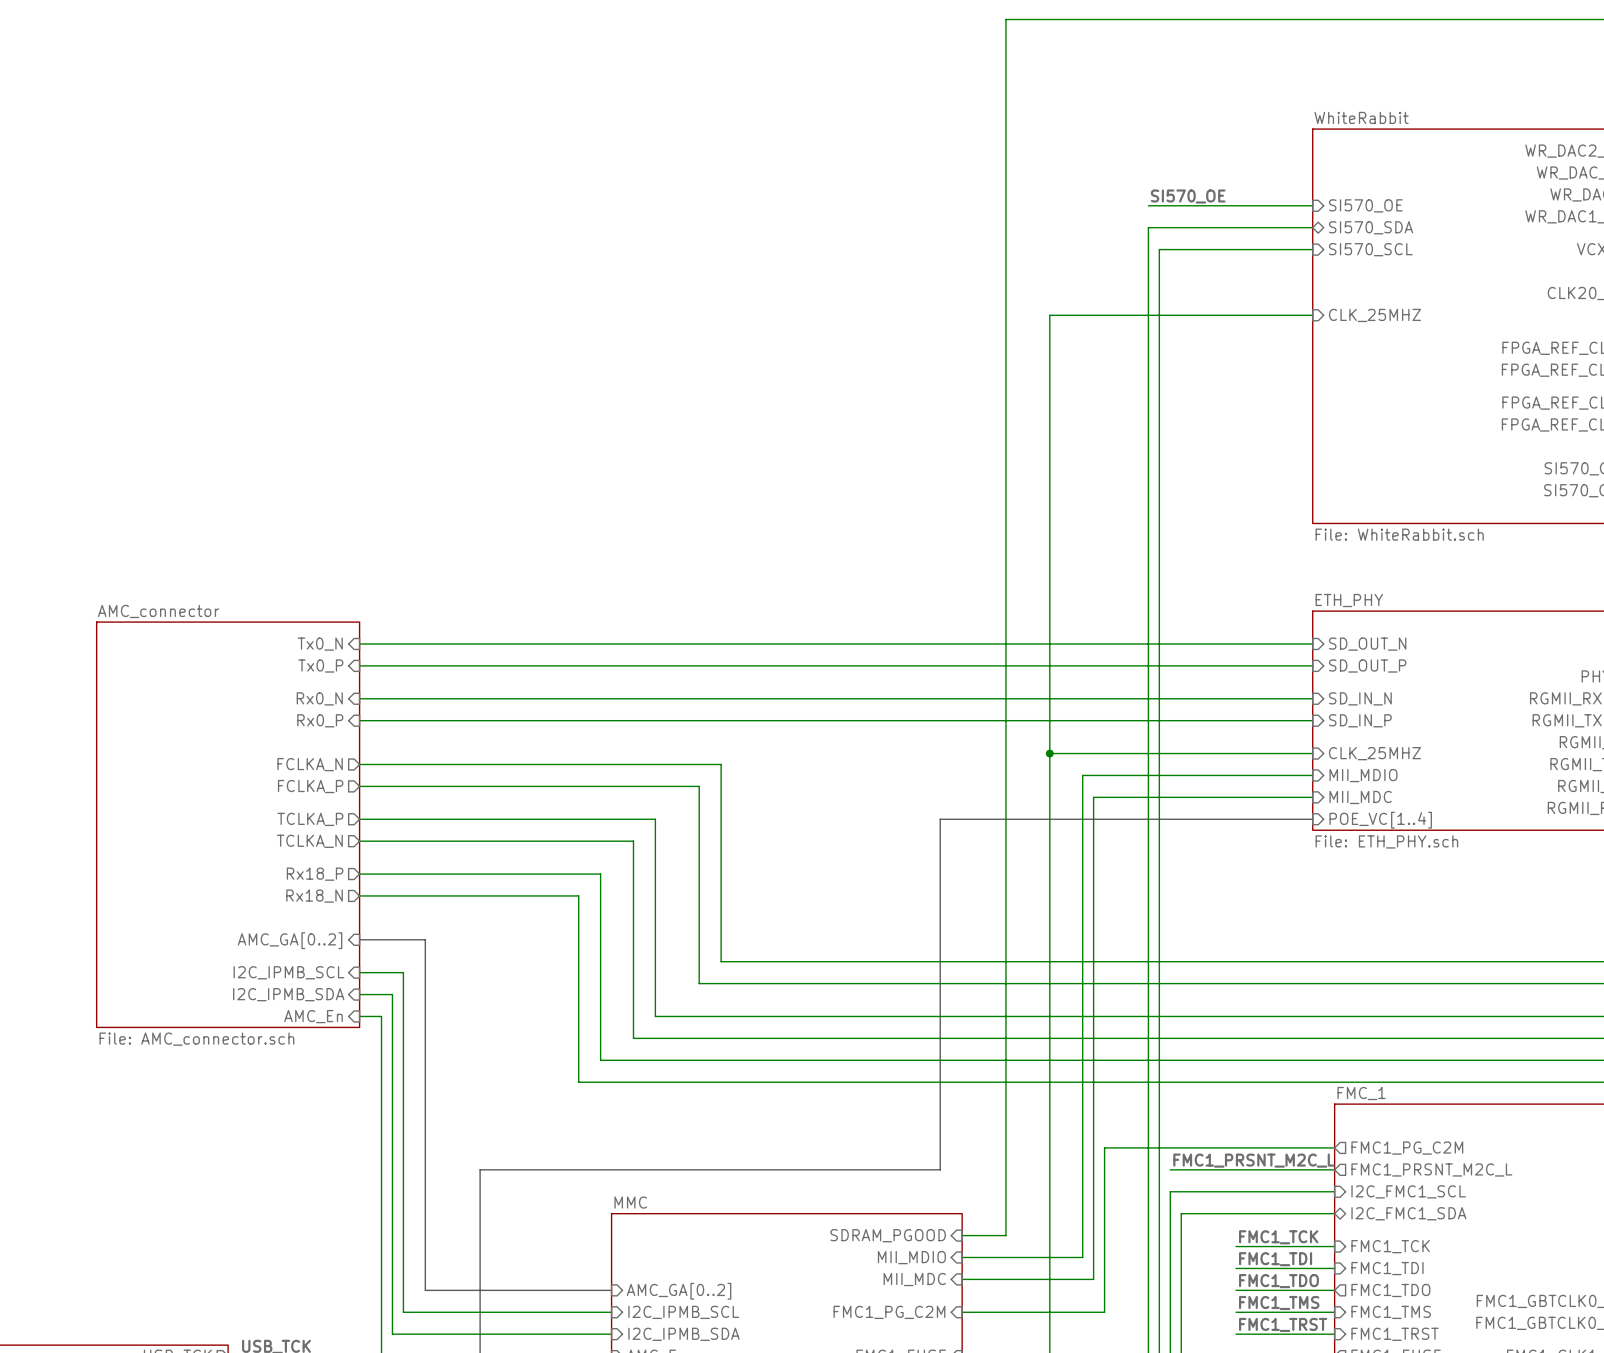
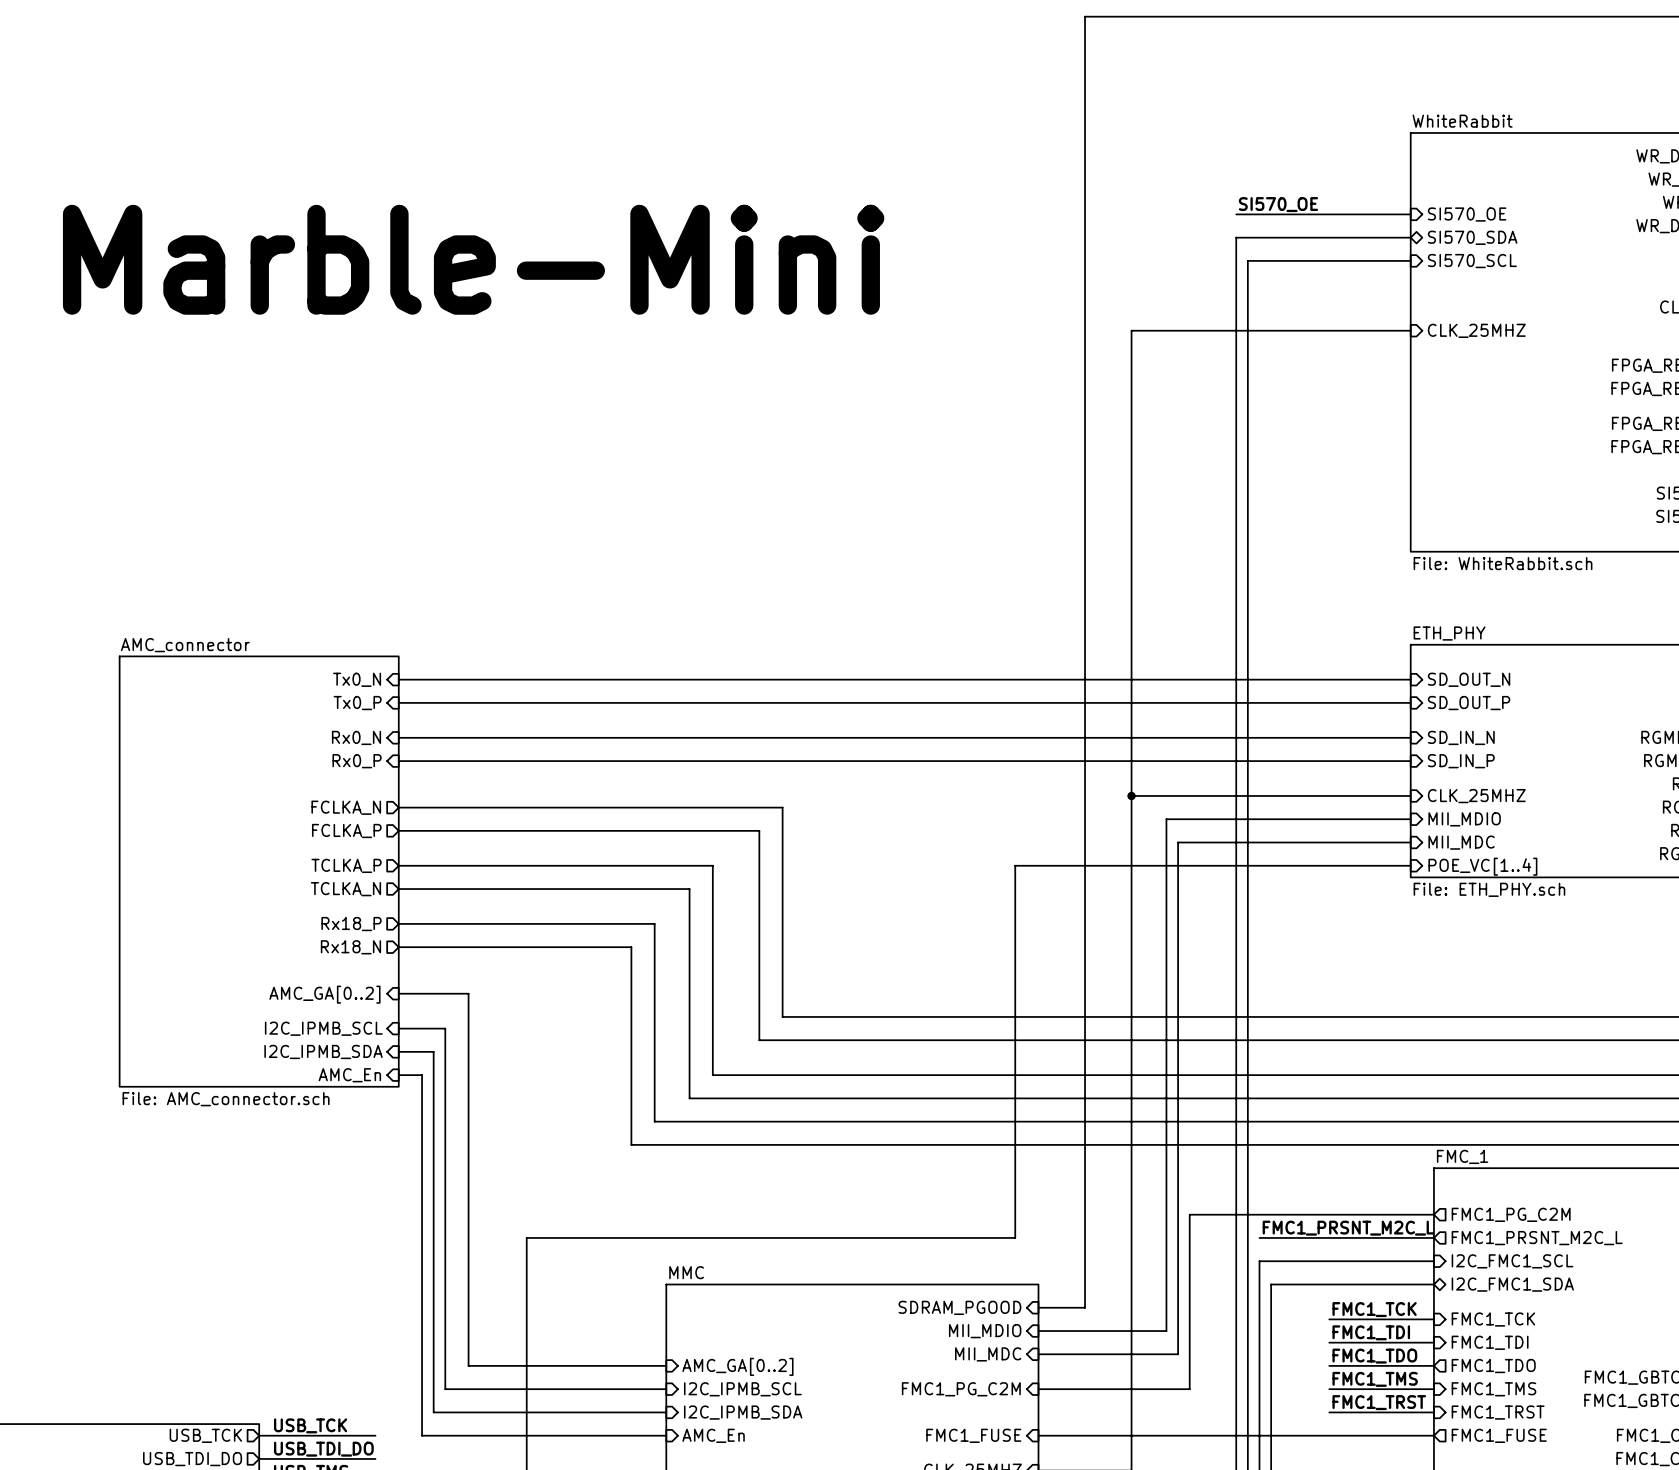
text: none -> Marble-Mini (473, 259)

